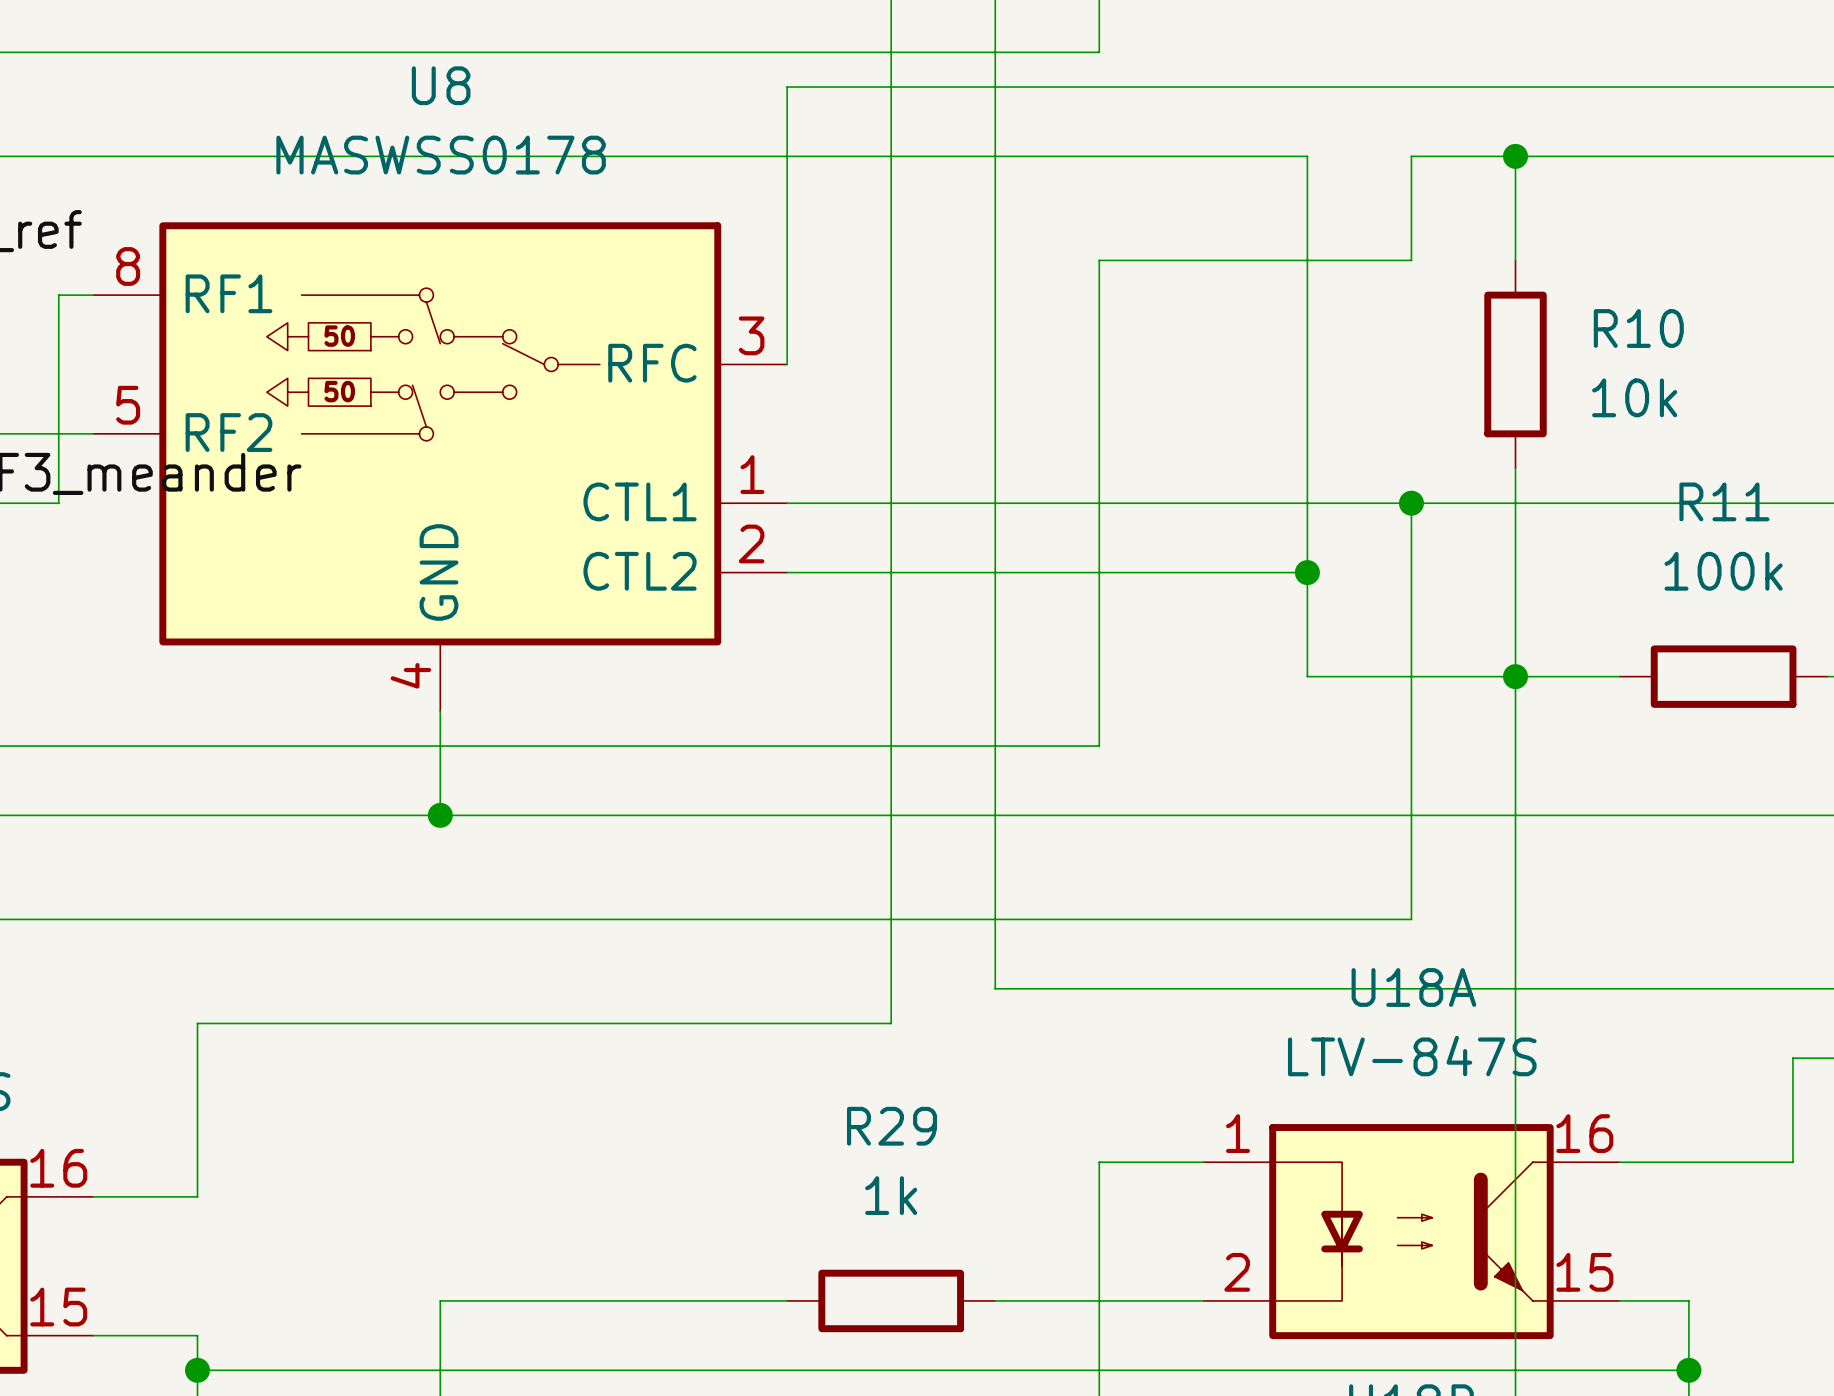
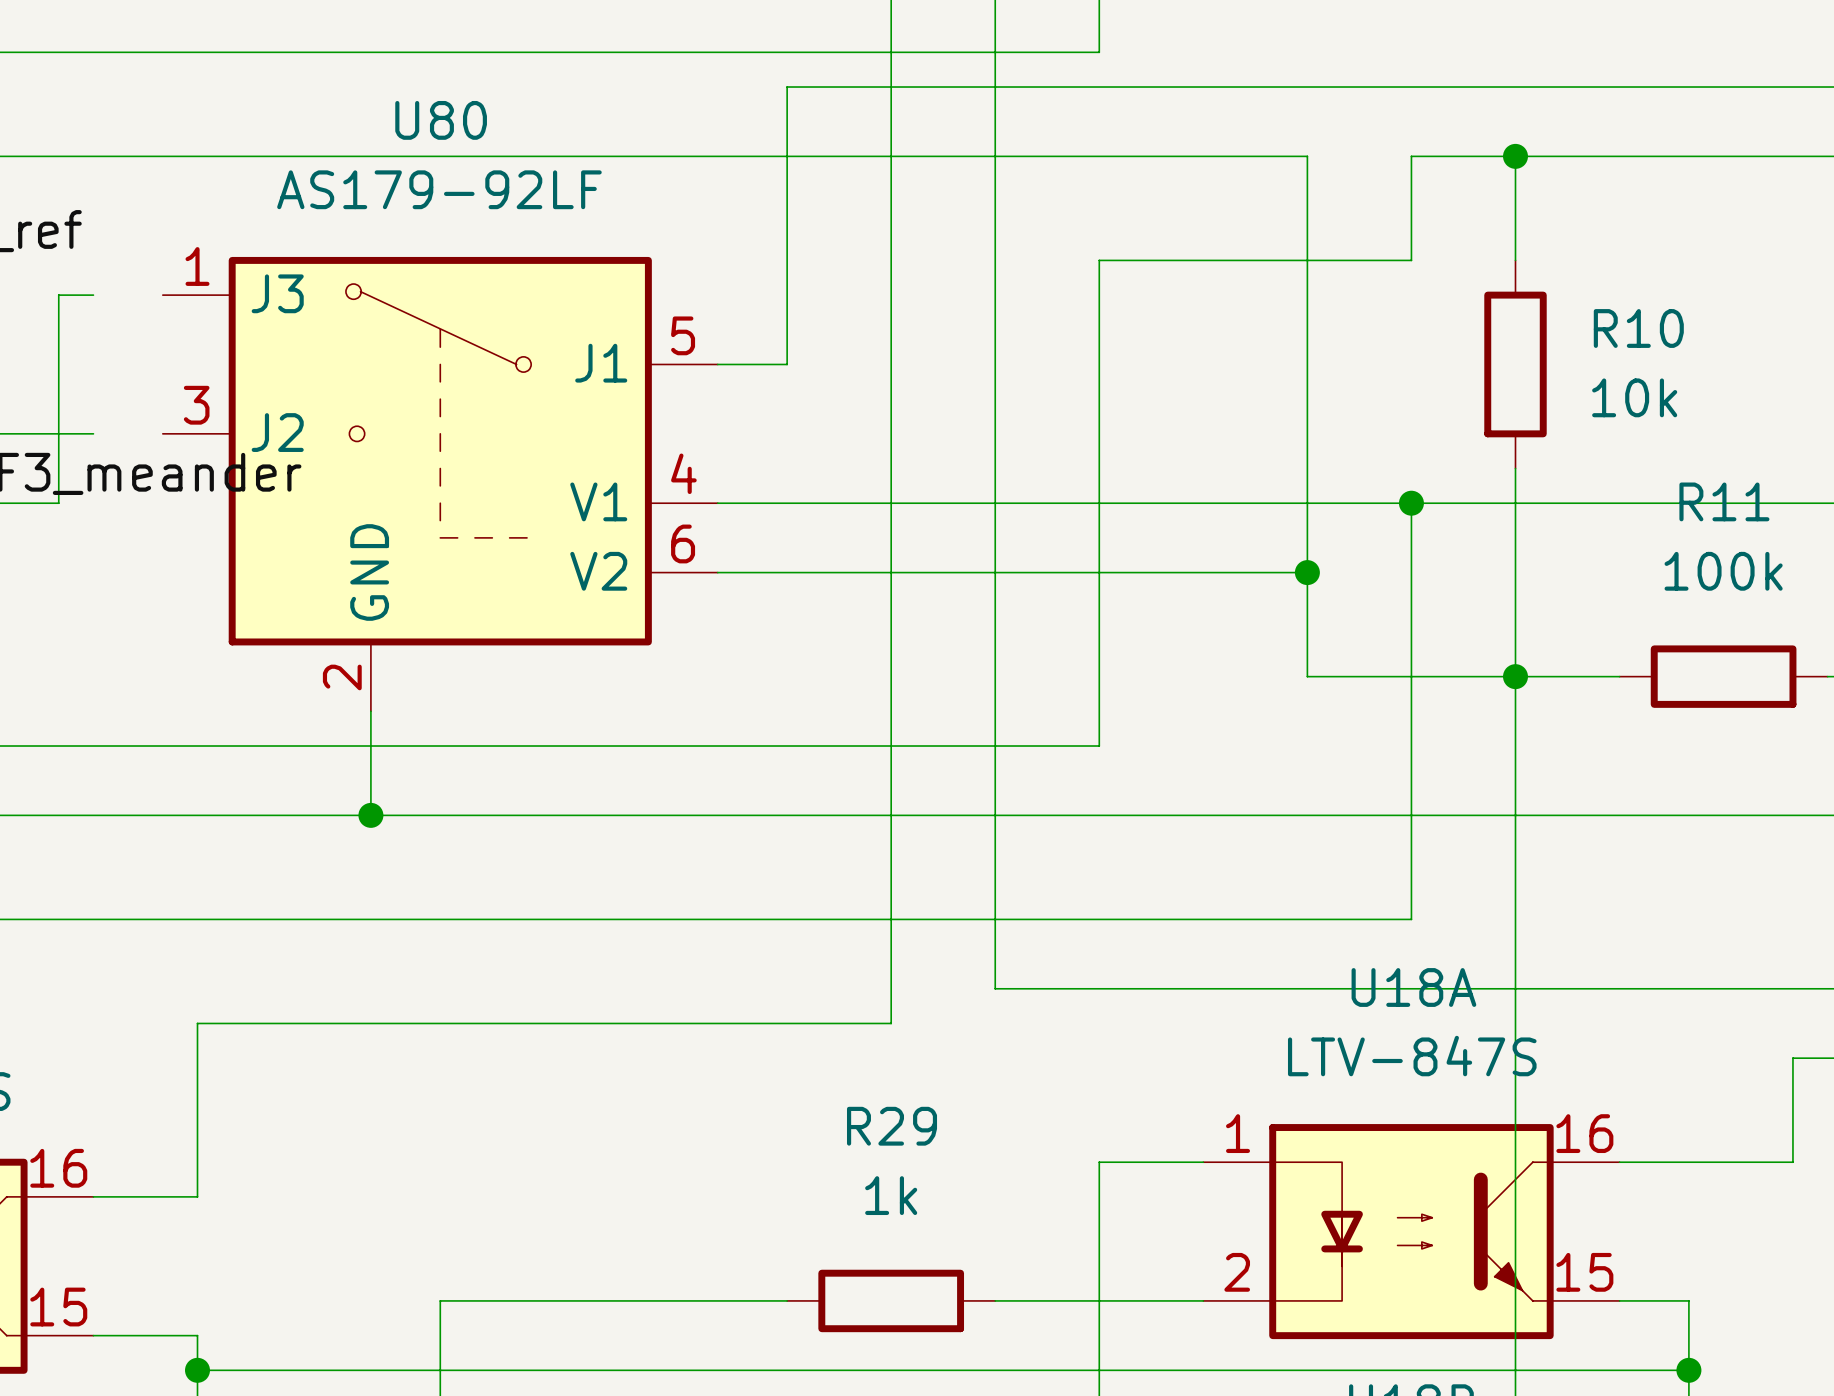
U8: MASWSS0178 (440, 466) -> none
U80: none -> AS179-92LF (440, 484)
wire: (440, 711) (440, 815) -> (370, 711) (370, 815)
junction position: (440, 815) -> (370, 815)

